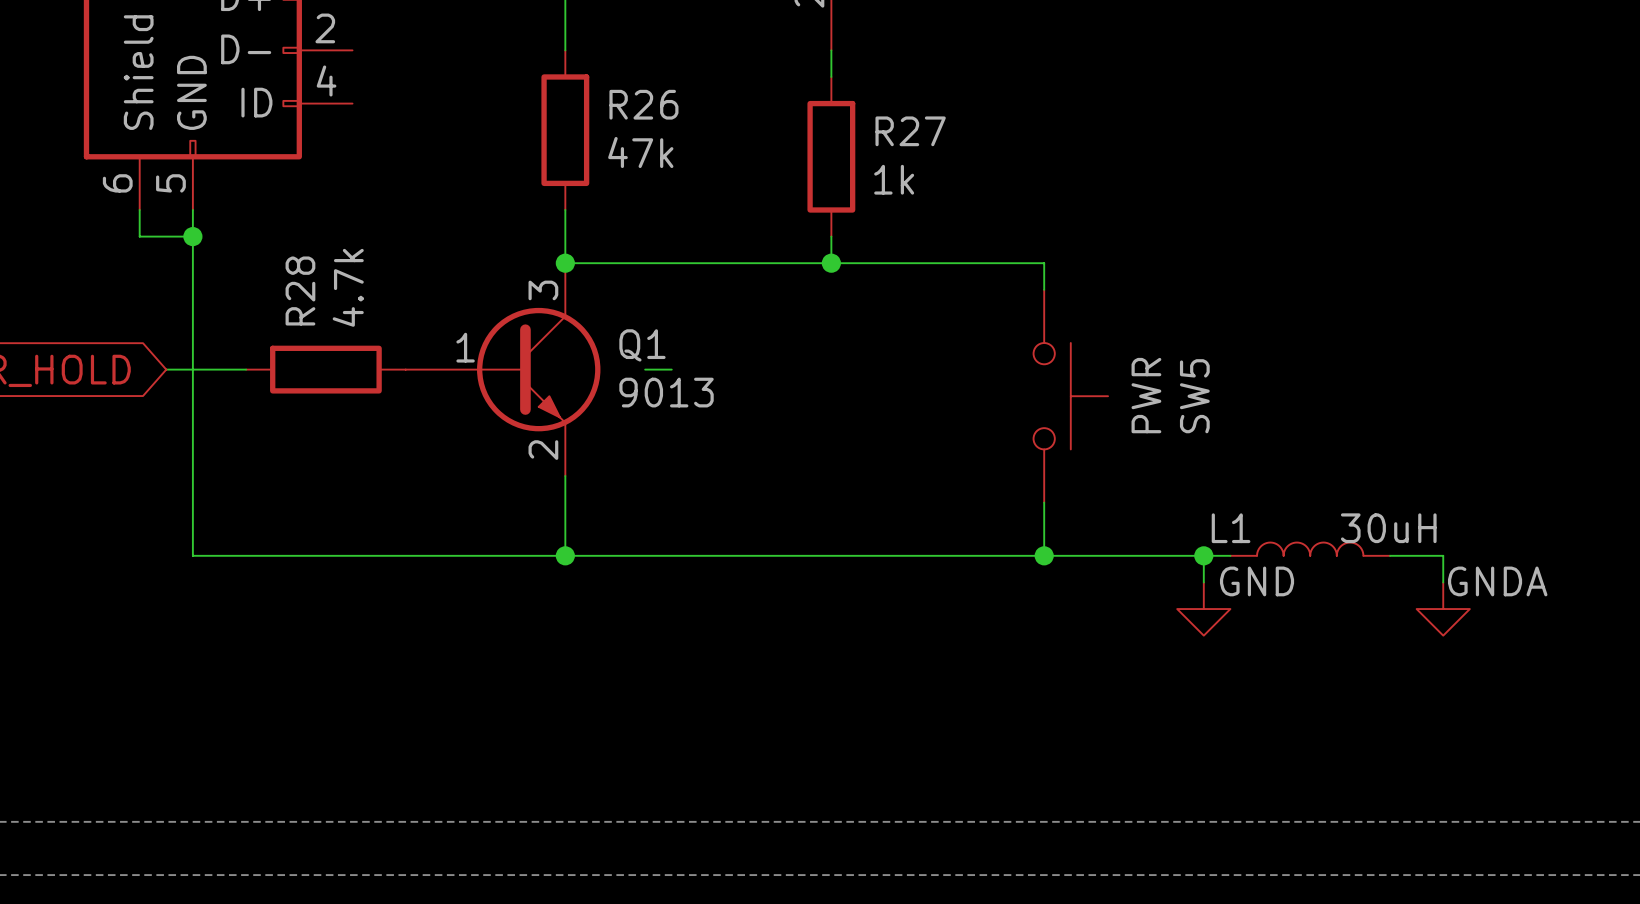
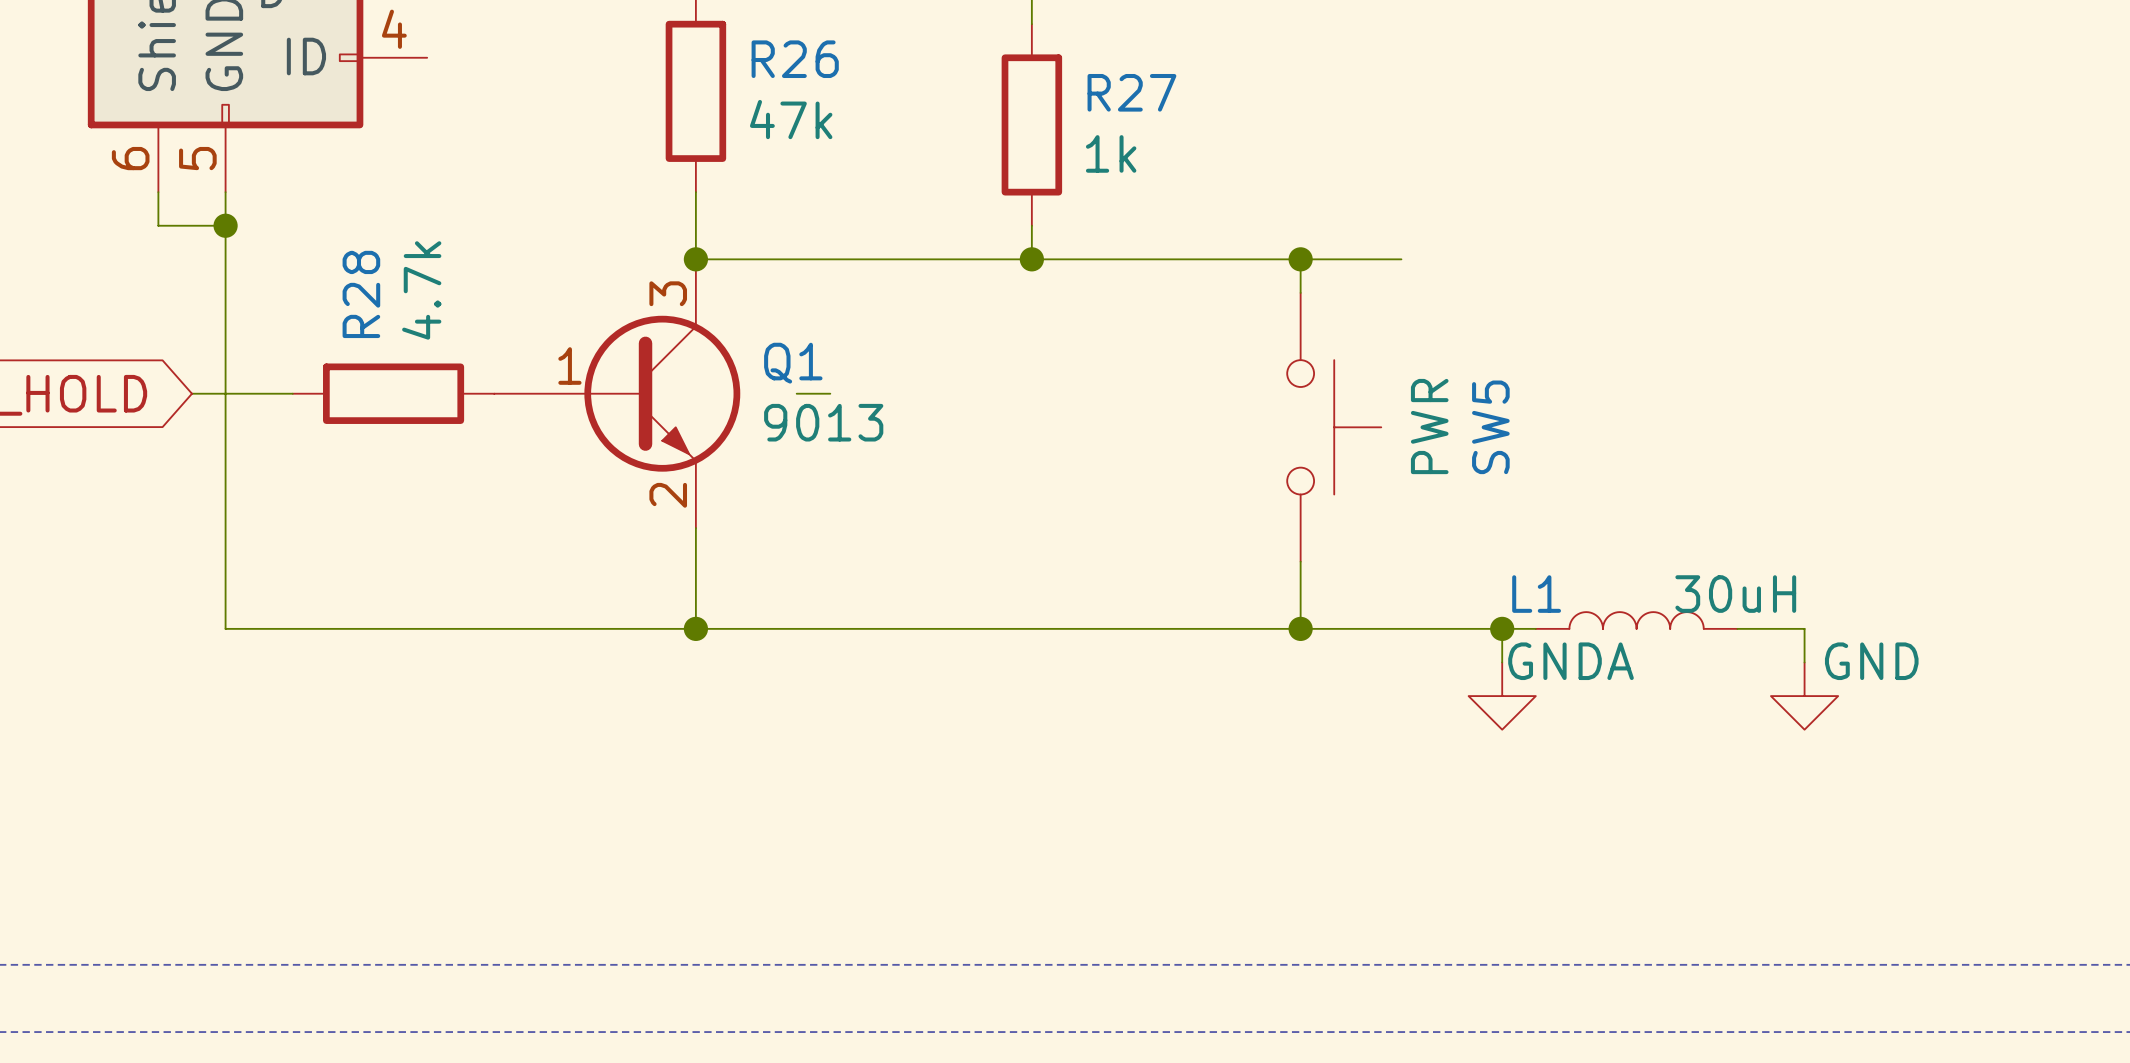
wire: none -> (1300, 259) (1401, 259)
junction: none -> (1300, 259)
power symbol: GND (1203, 609) -> GNDA (1502, 696)
power symbol: GNDA (1443, 609) -> GND (1804, 696)

